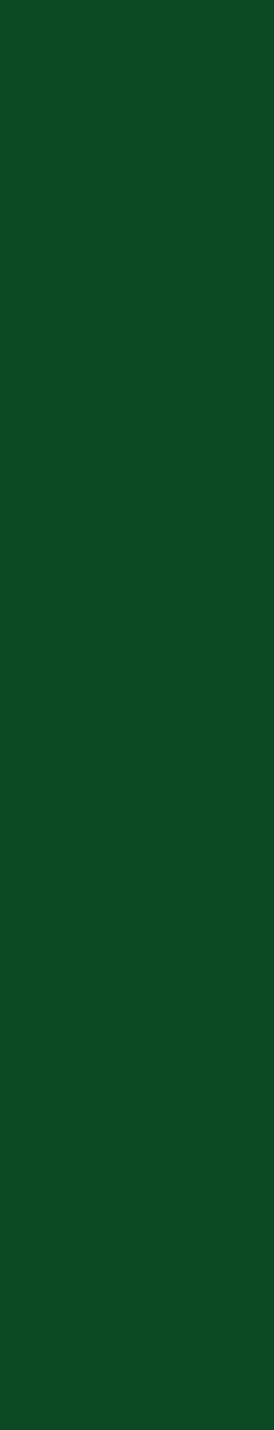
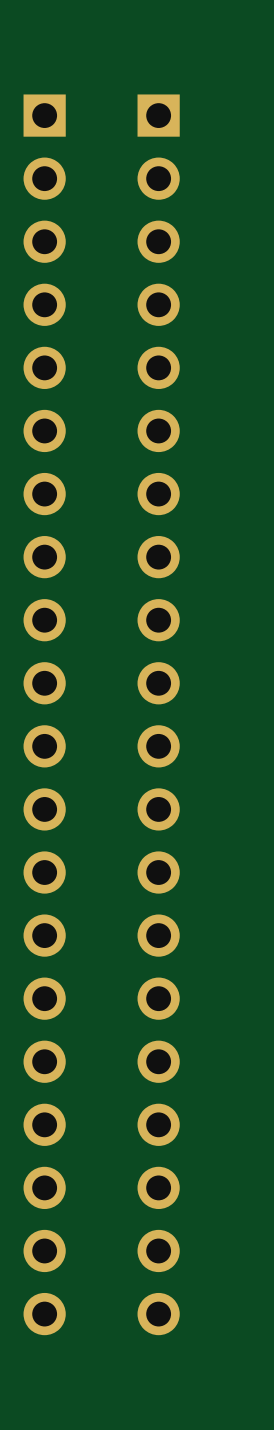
part: none -> (44, 714)
part: none -> (158, 714)

